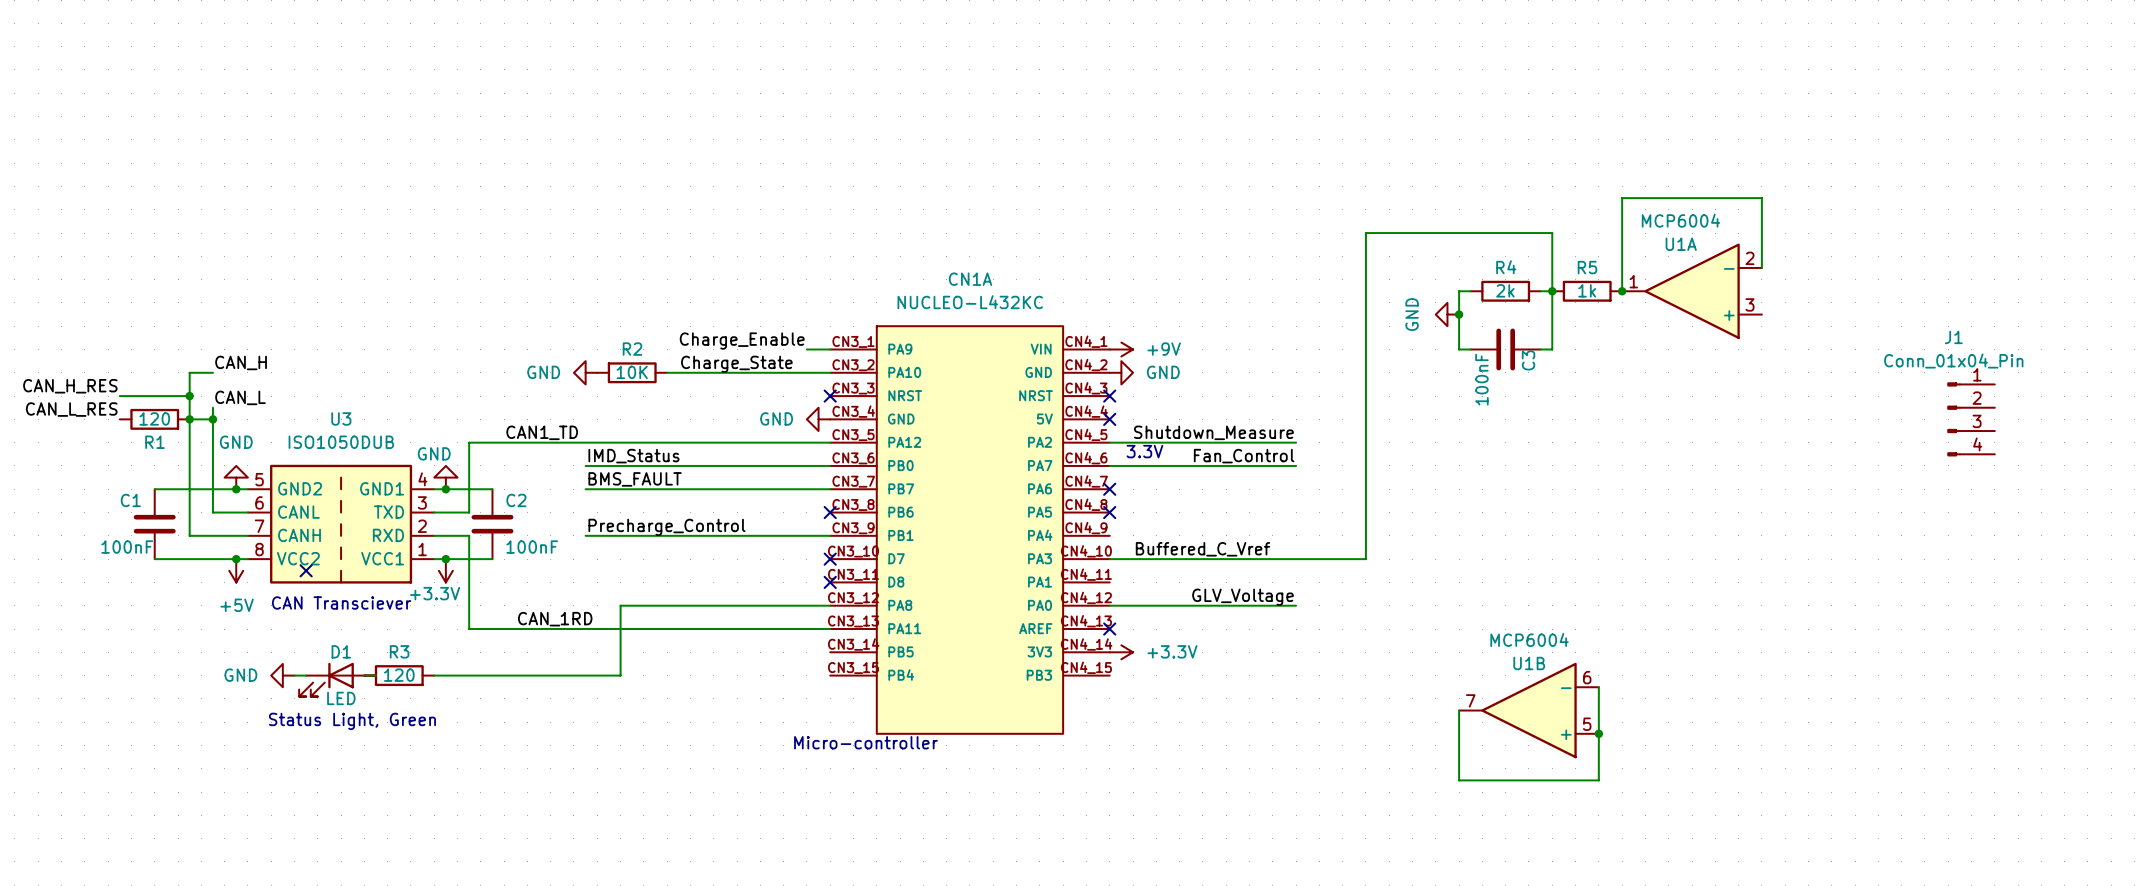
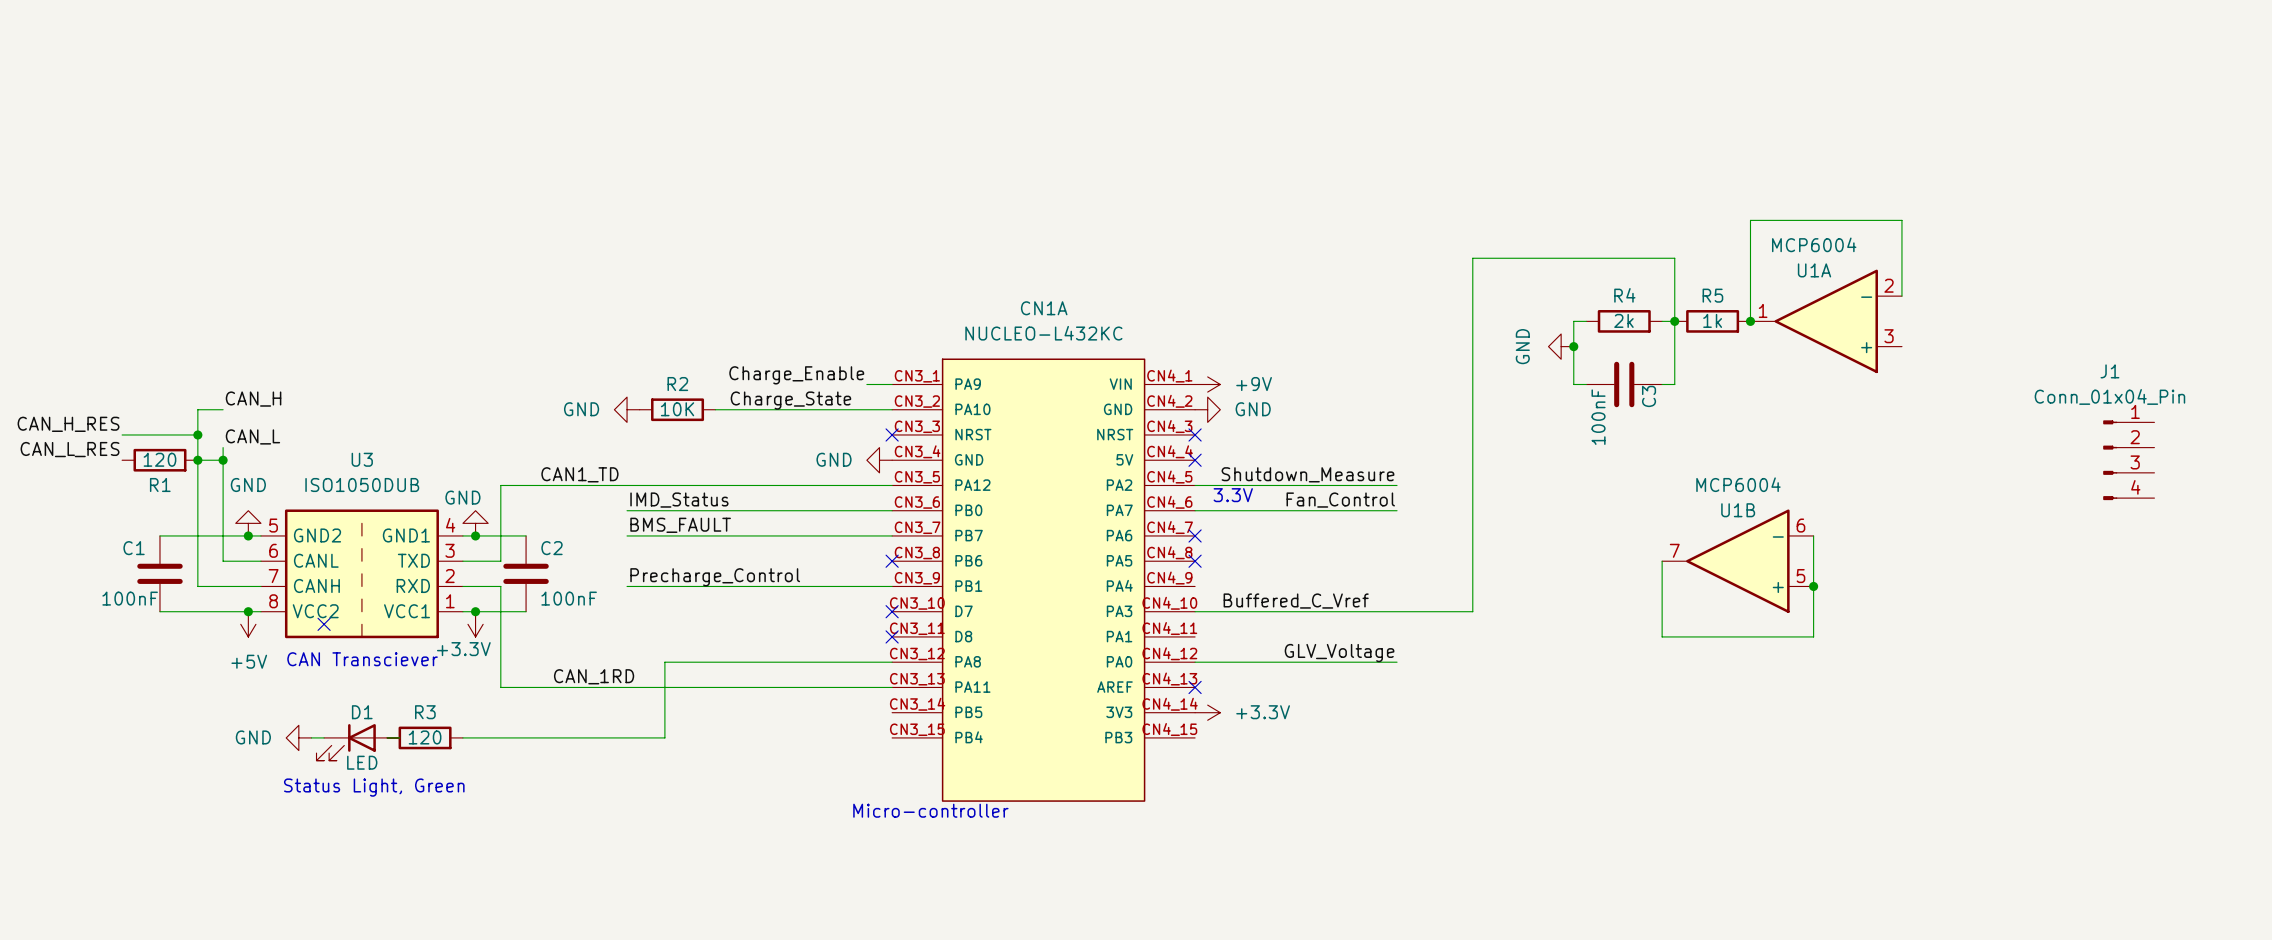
junction: none -> (1813, 586)
wire: (1598, 687) (1598, 780) (1459, 780) (1459, 710) -> (1813, 535) (1813, 636) (1662, 636) (1662, 561)
U1B position: (1528, 710) -> (1737, 561)
junction: (1598, 733) -> none

